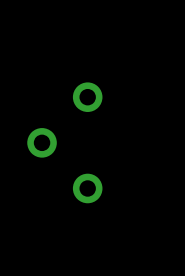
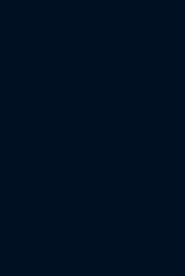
part: (64, 142) -> none

